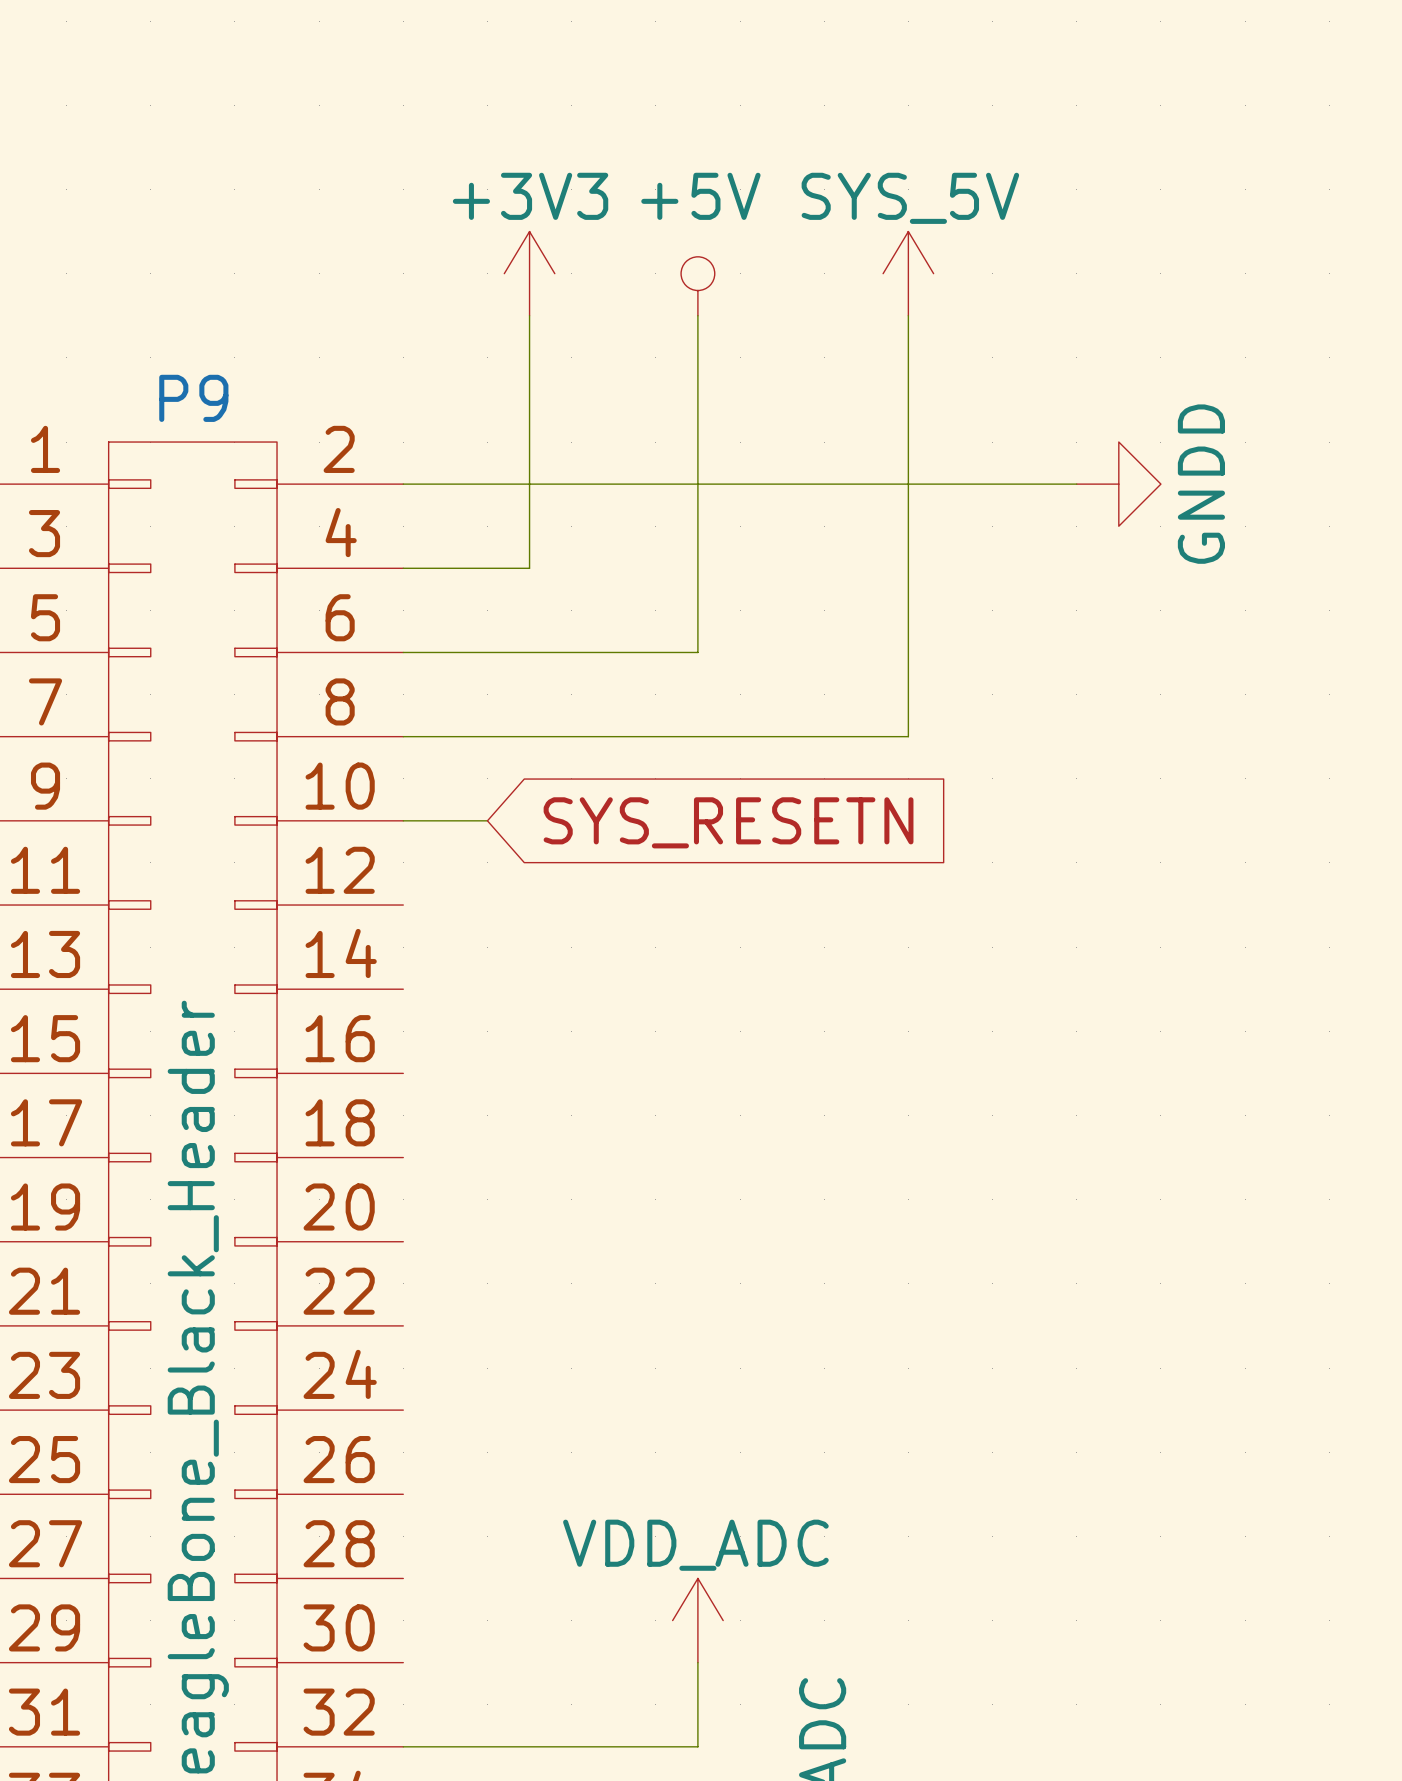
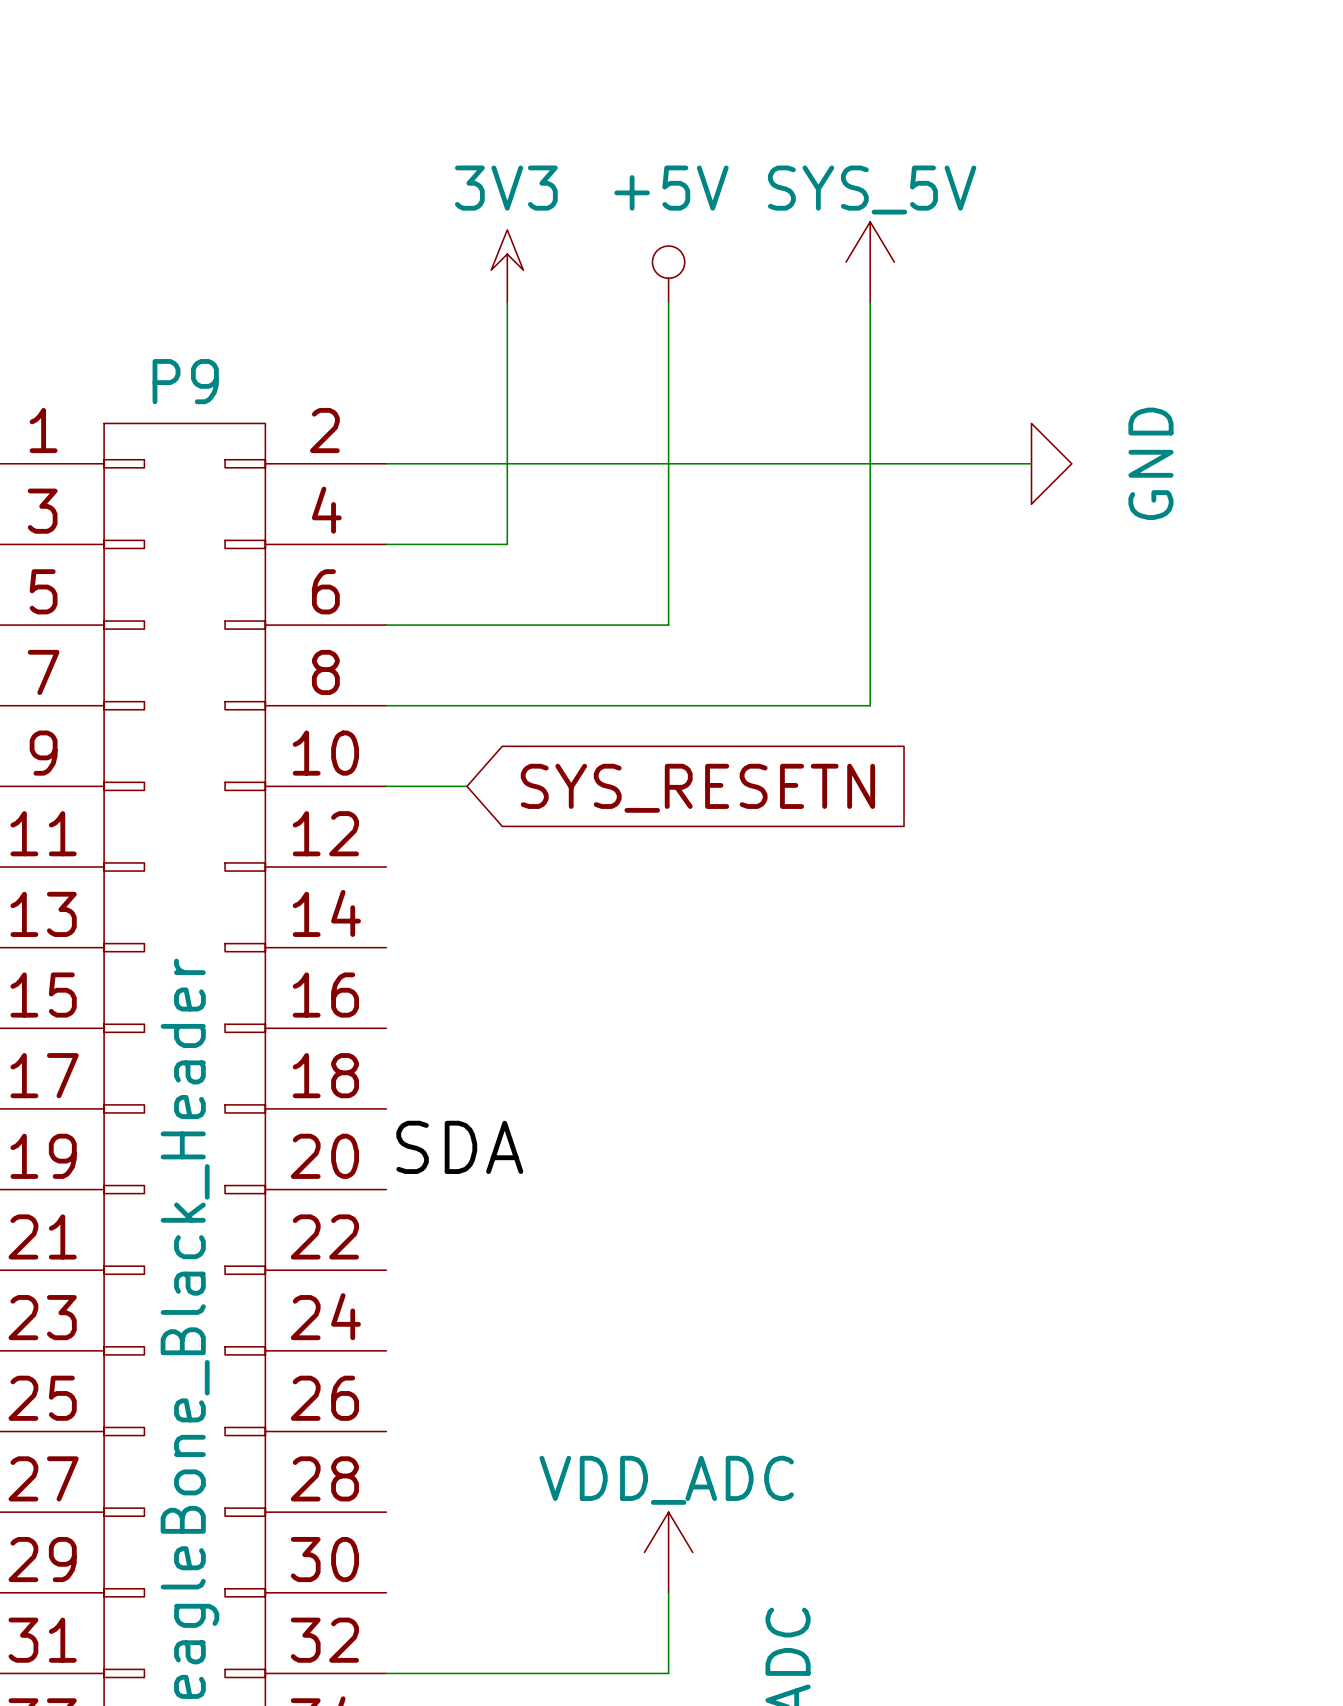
power symbol: +3V3 (529, 273) -> 3V3 (507, 266)
power symbol: GNDD (1118, 484) -> GND (1051, 463)
label: none -> SDA (459, 1147)

